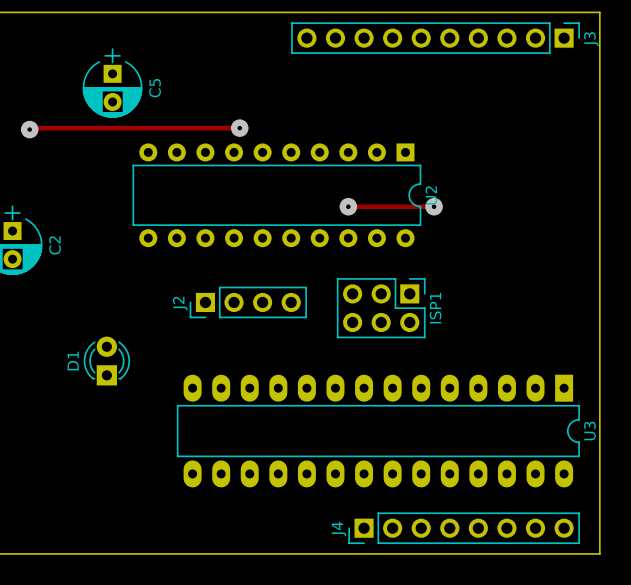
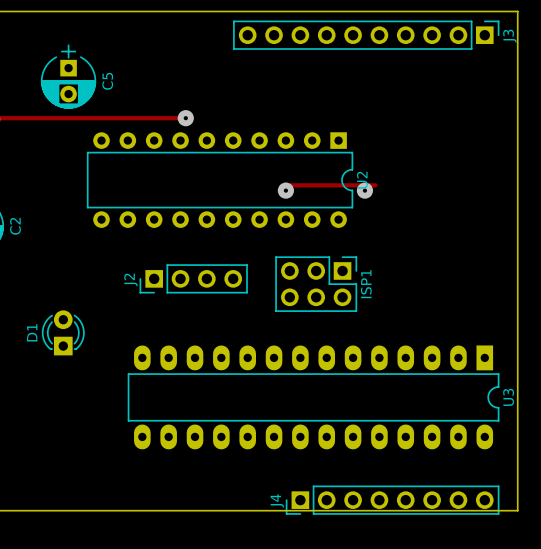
track: none -> (285, 184) (375, 185)
track: (434, 206) (349, 207) -> none
J4 position: (464, 528) -> (392, 500)

